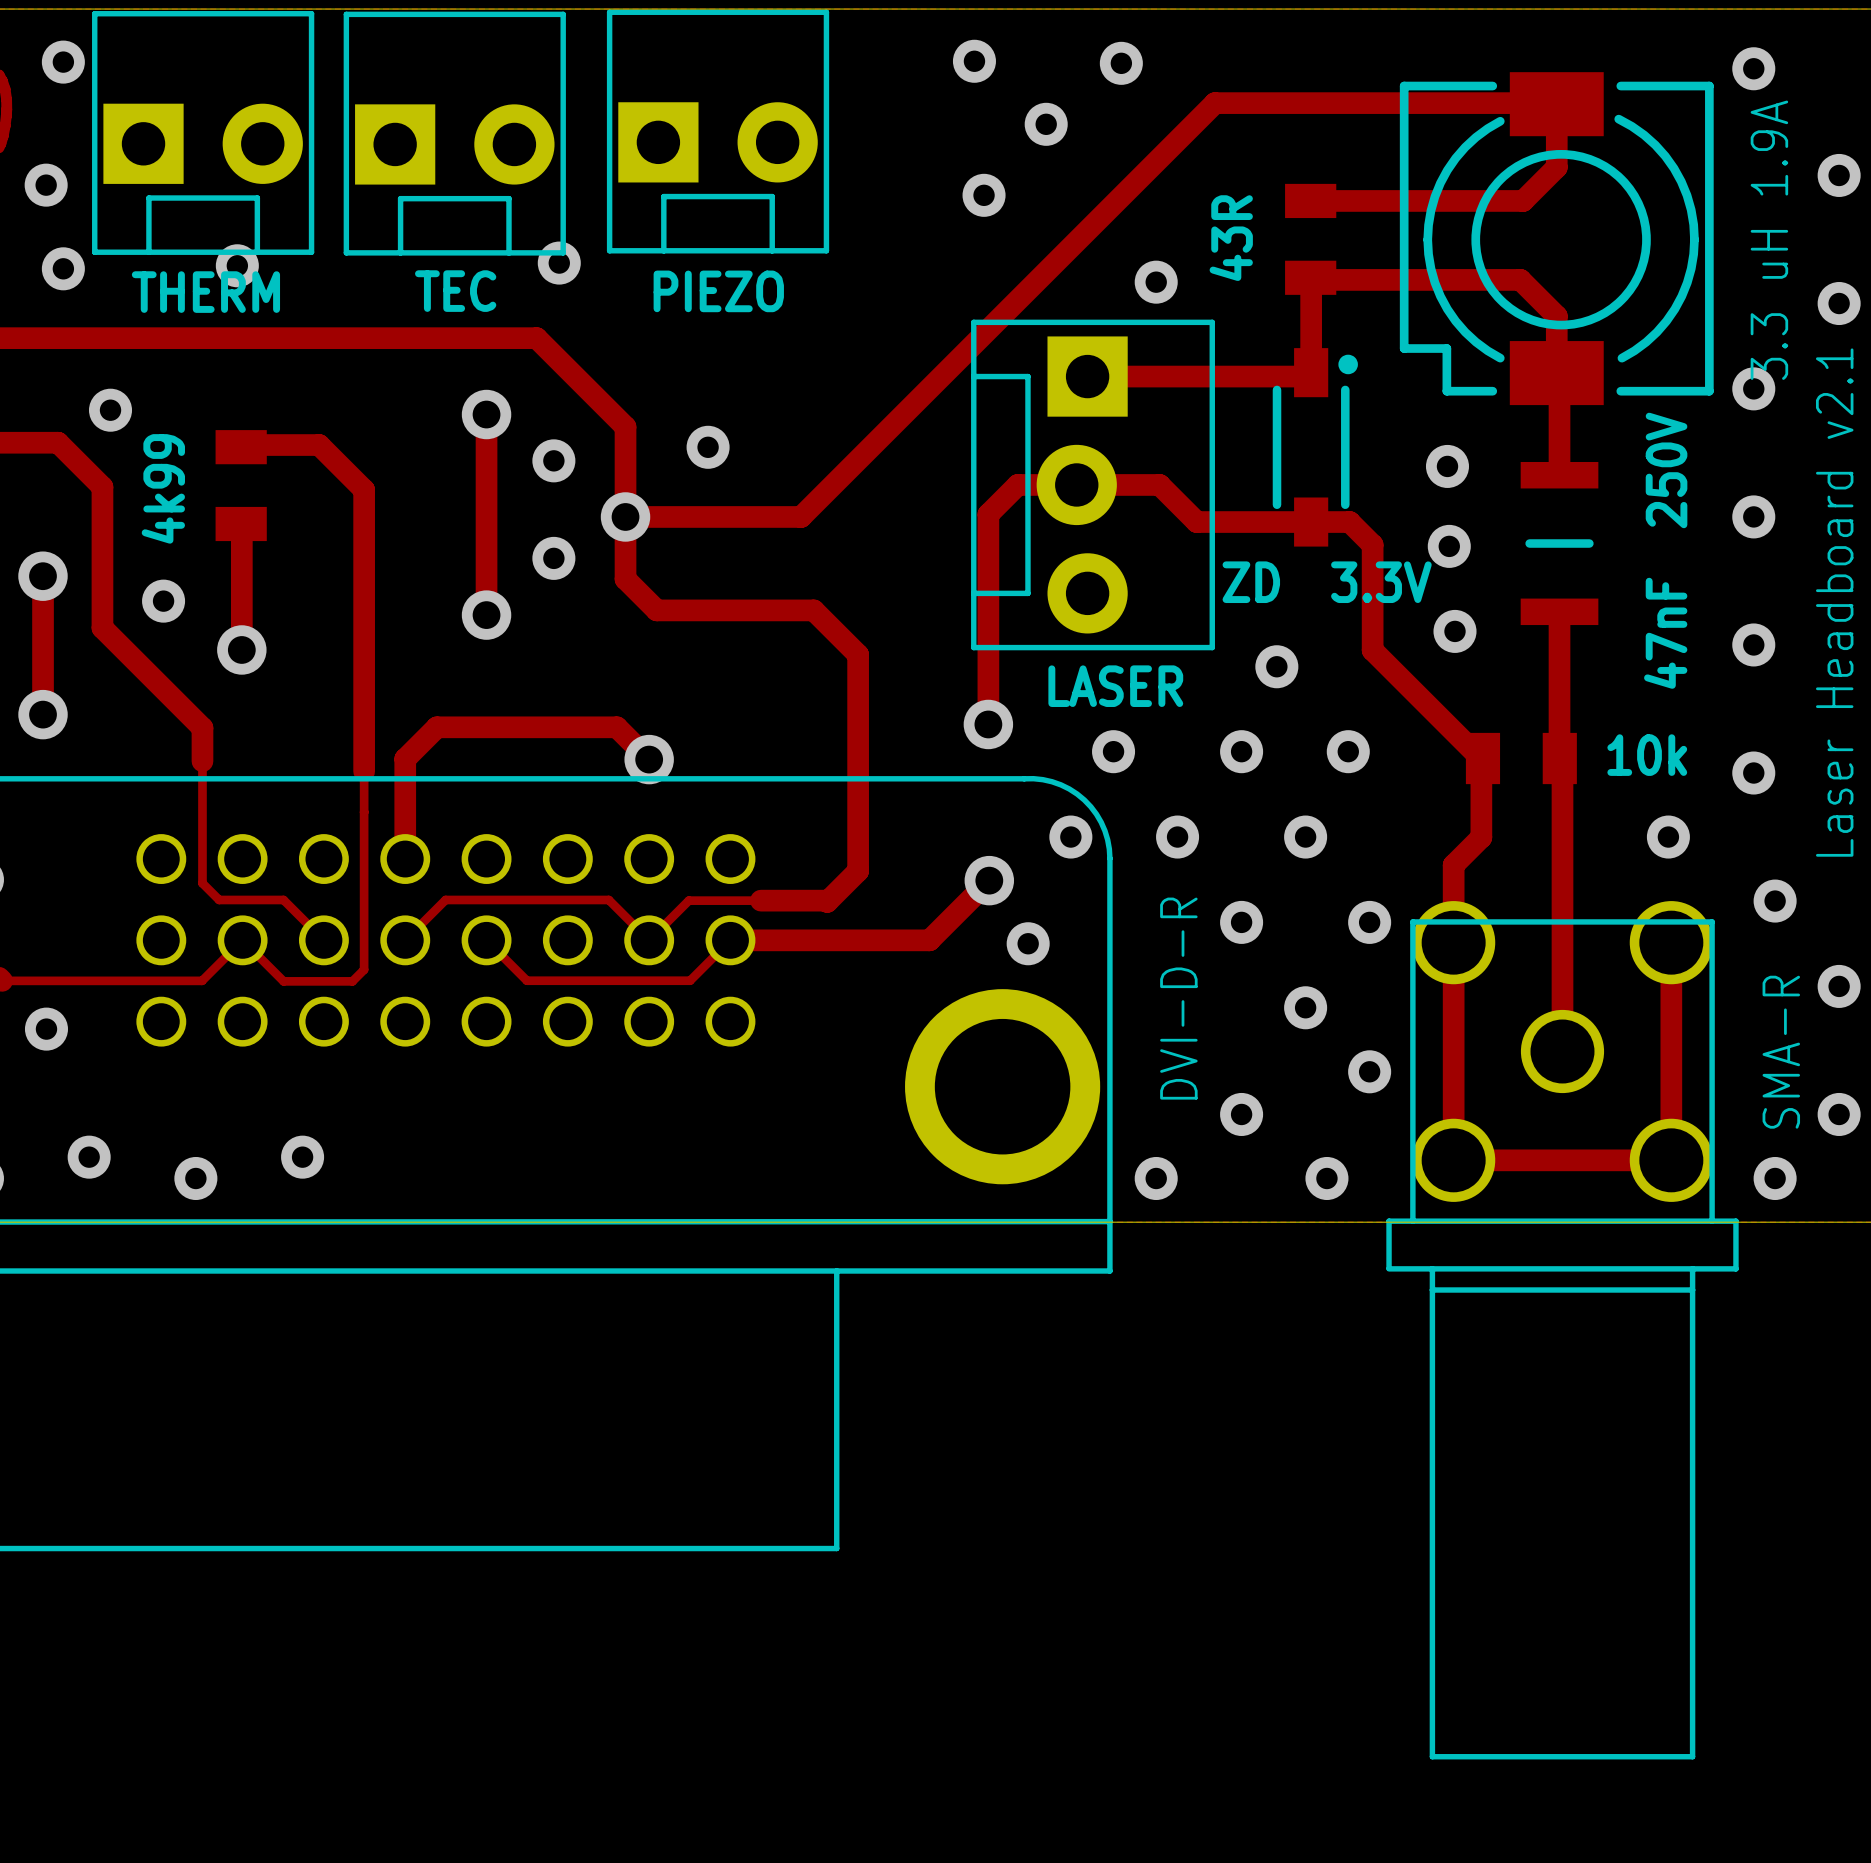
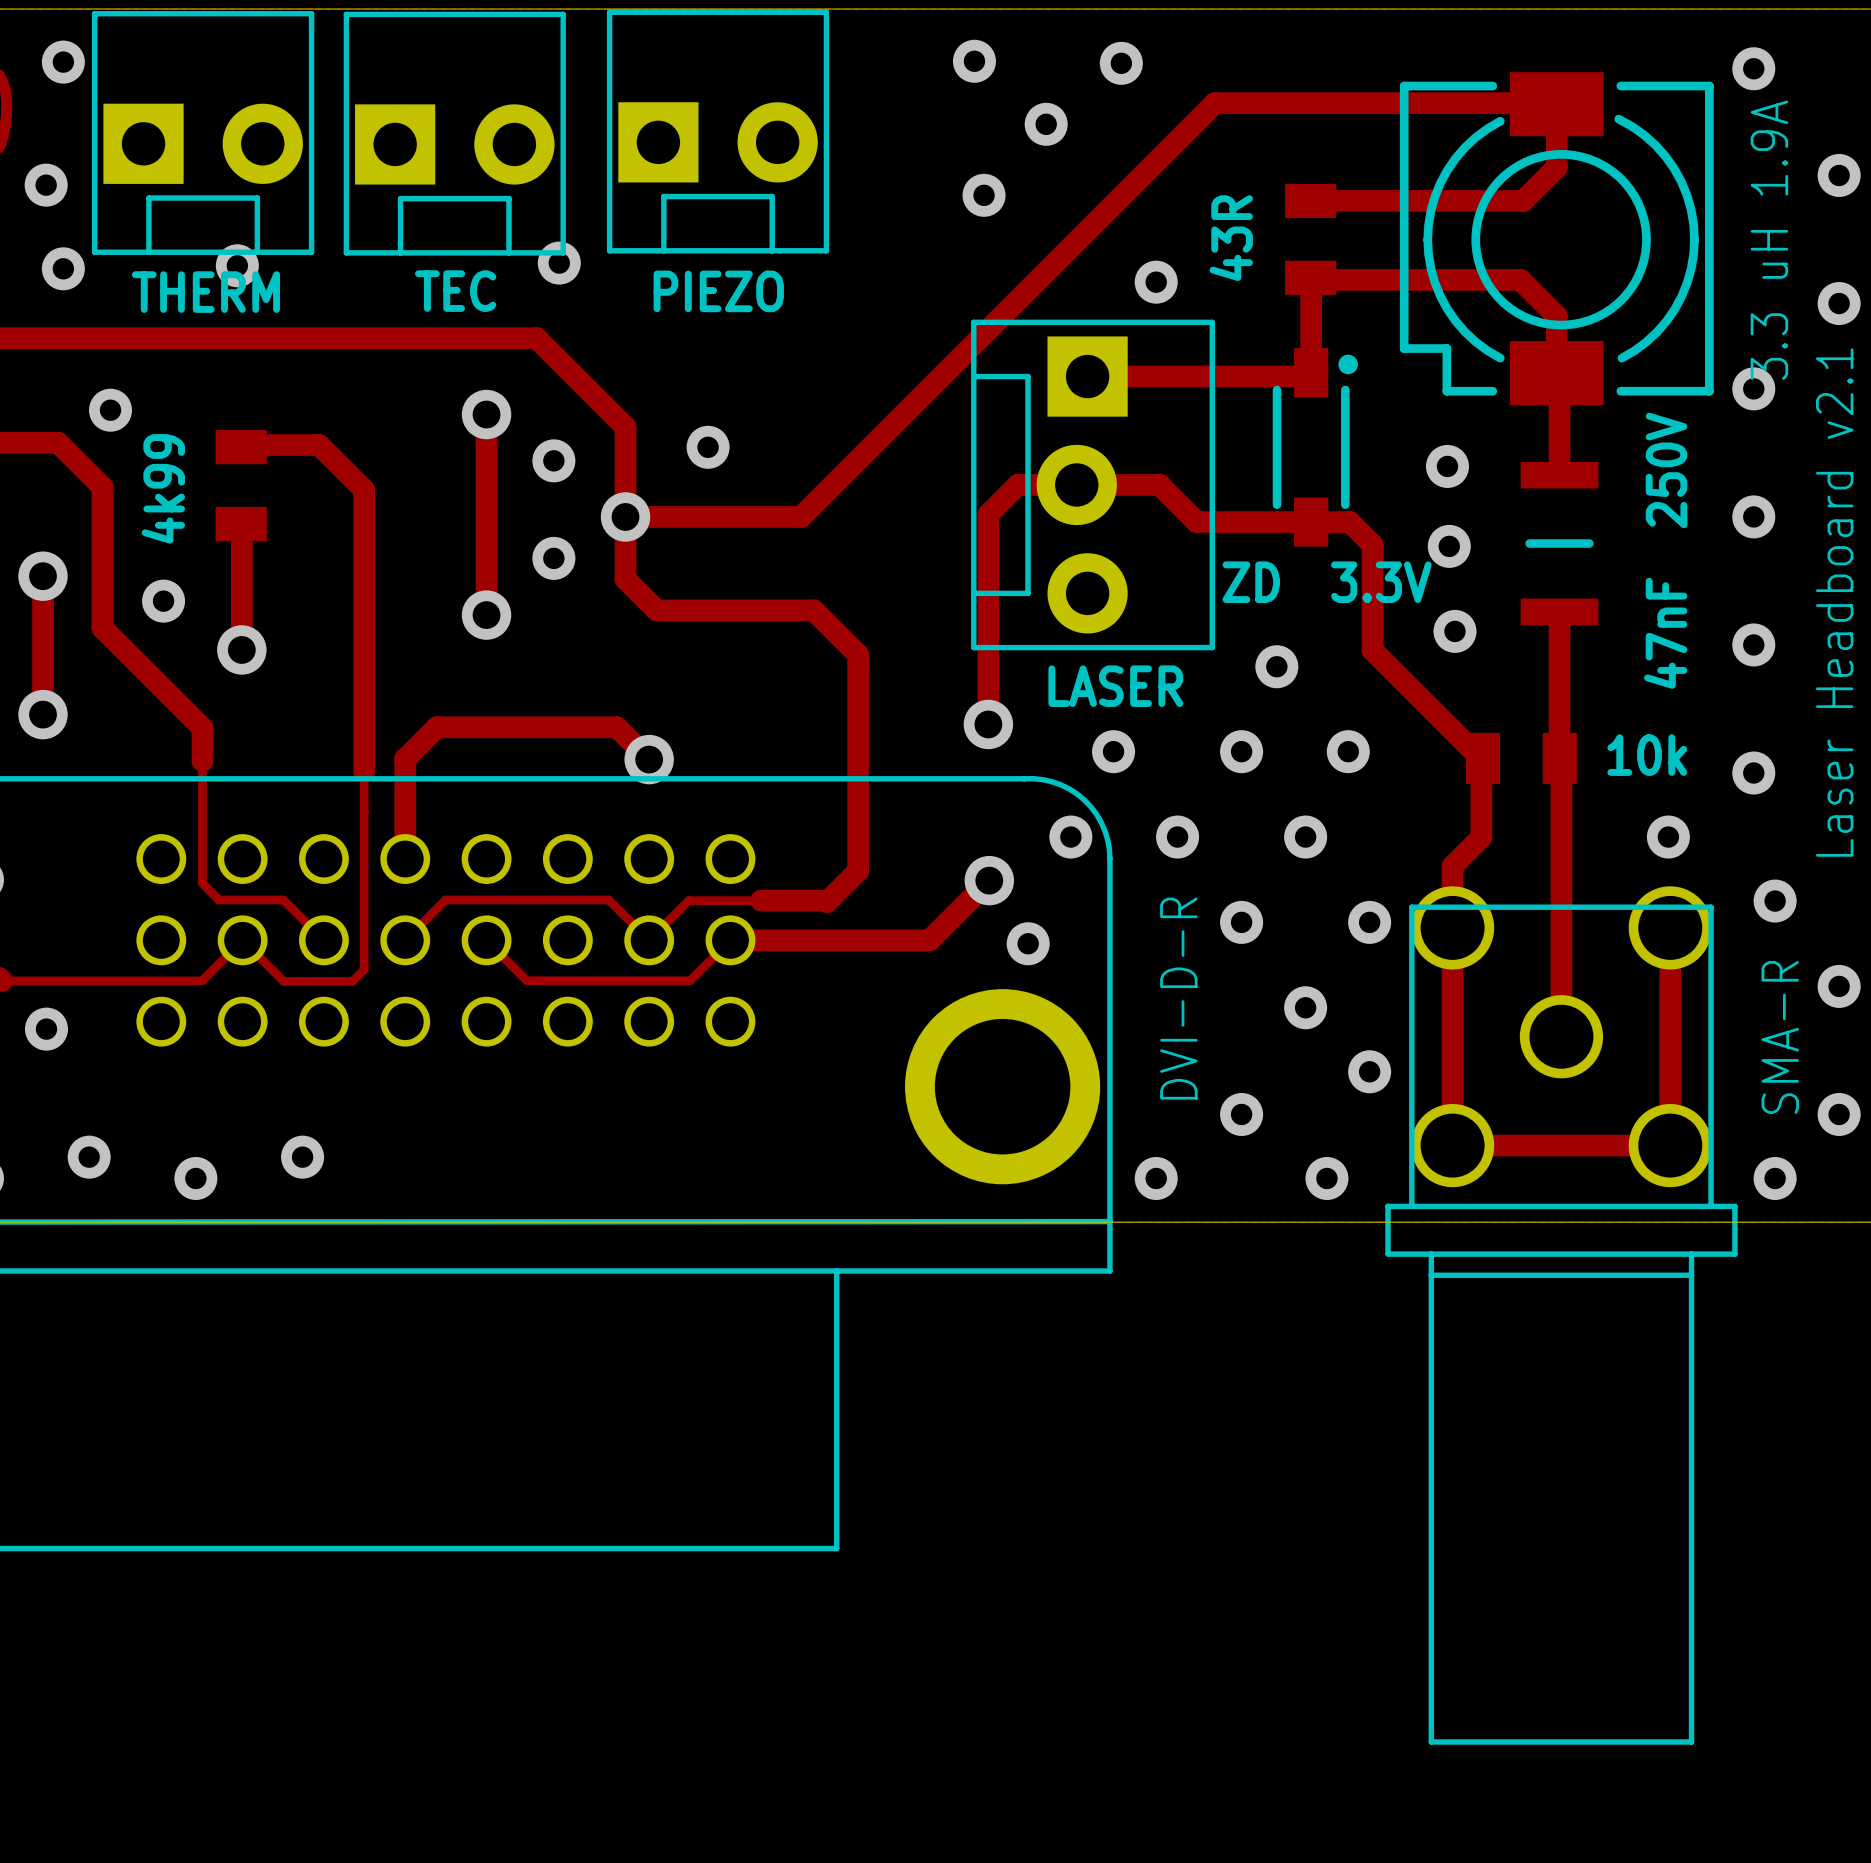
track: (1561, 760) (1562, 1051) -> (1561, 760) (1561, 1036)
track: (1453, 865) (1453, 1160) (1671, 1160) (1671, 942) -> (1453, 865) (1452, 1145) (1670, 1145) (1670, 927)
part position: (1562, 1330) -> (1561, 1315)

